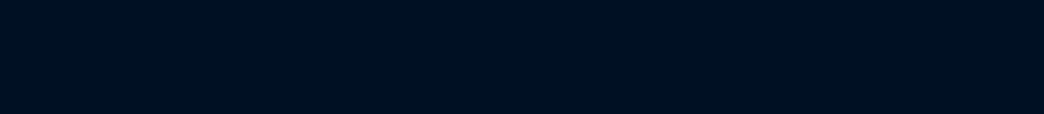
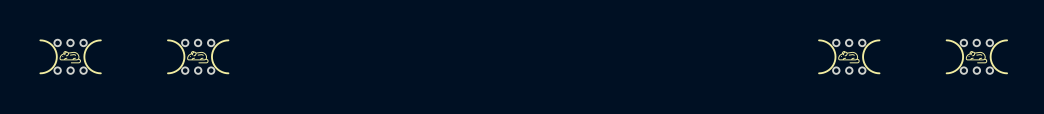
part: none -> (70, 56)
part: none -> (198, 56)
part: none -> (849, 56)
part: none -> (976, 56)

